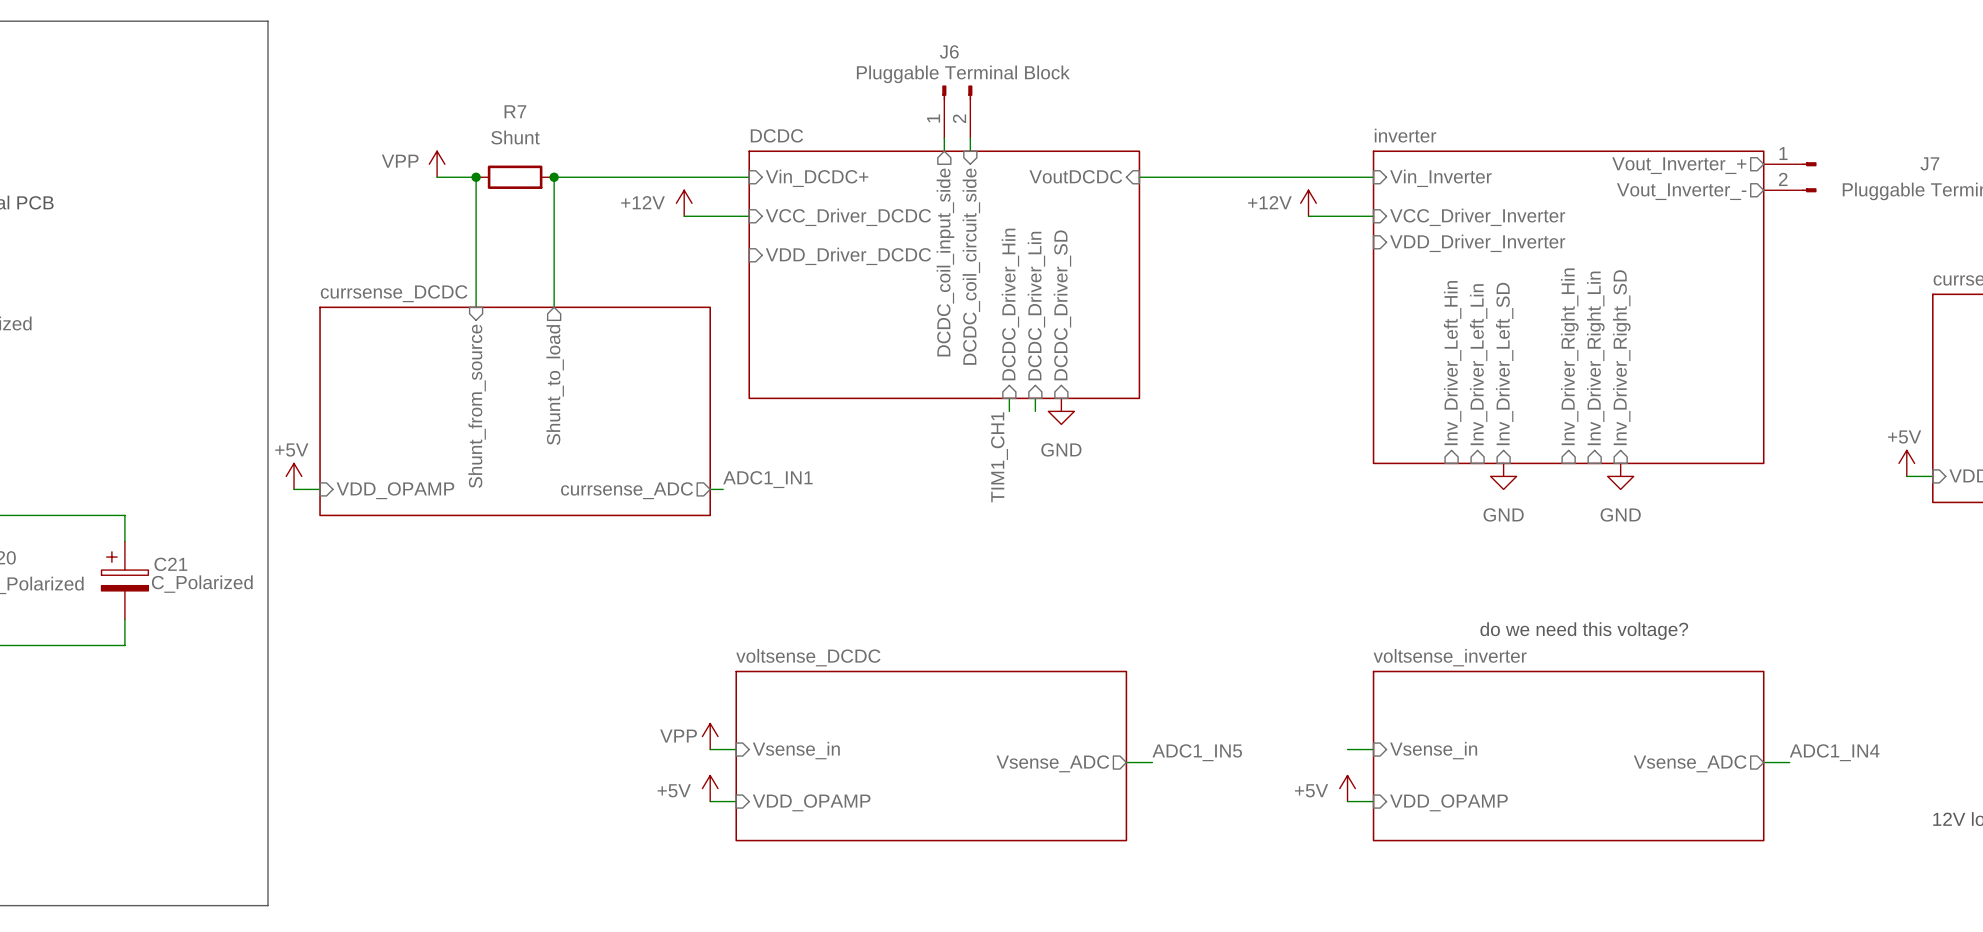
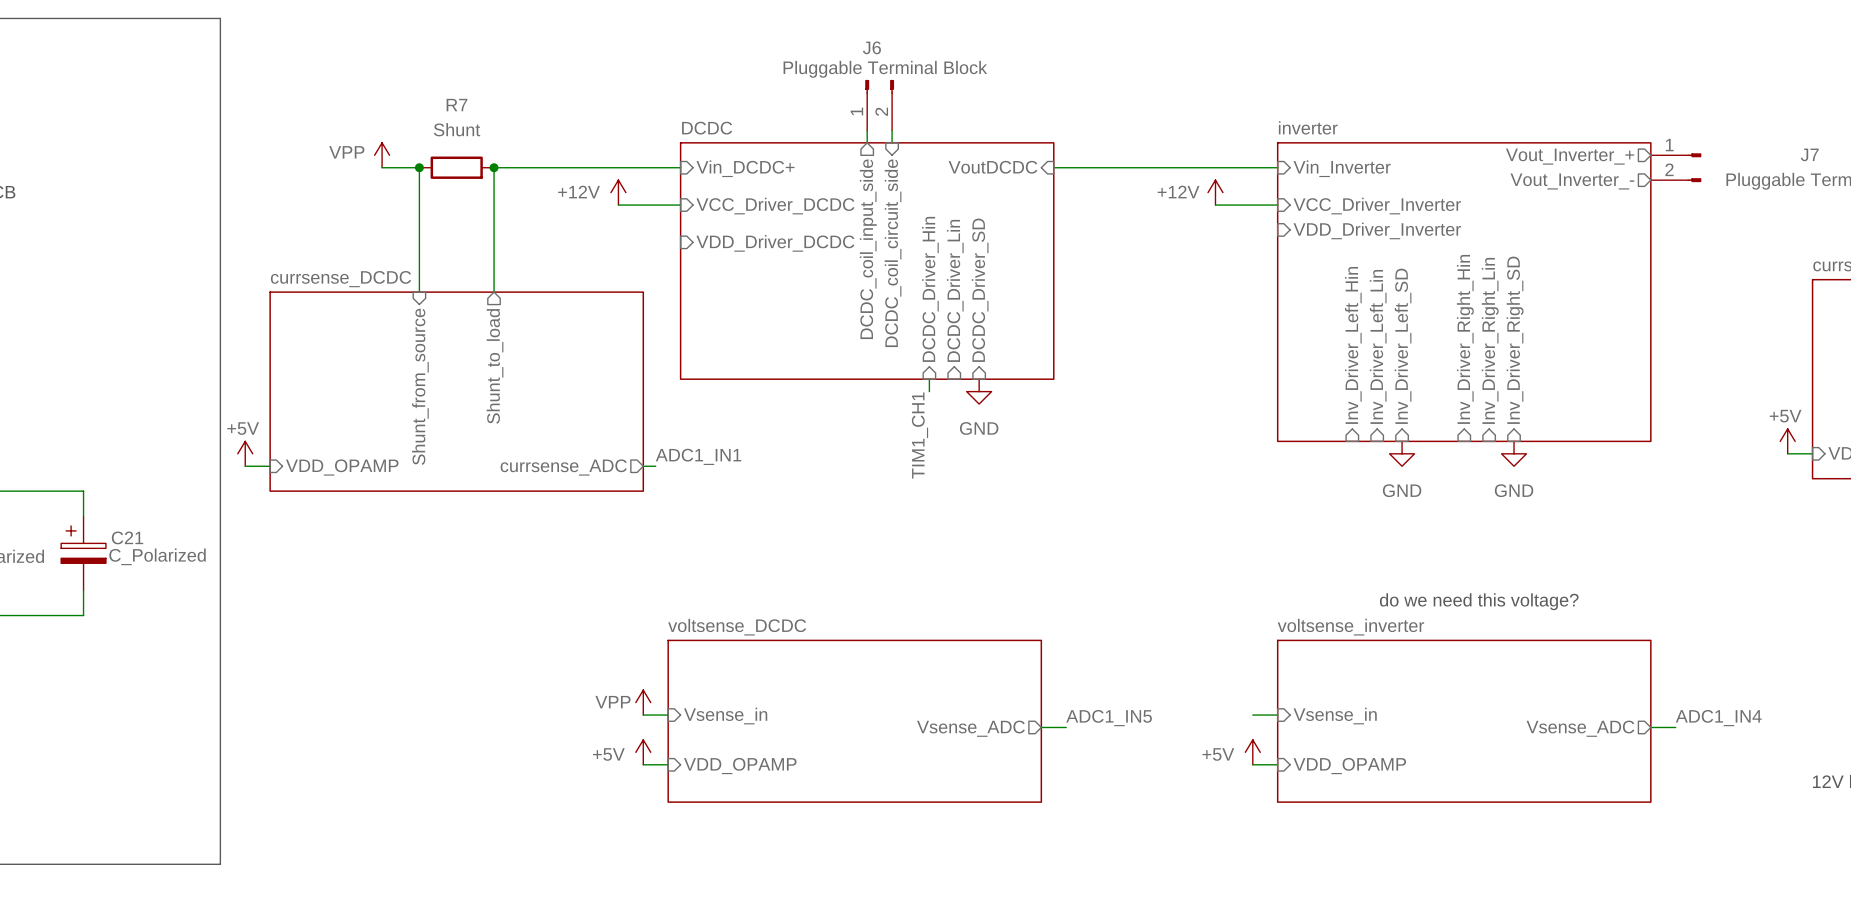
wire: (1035, 398) (1035, 411) -> none

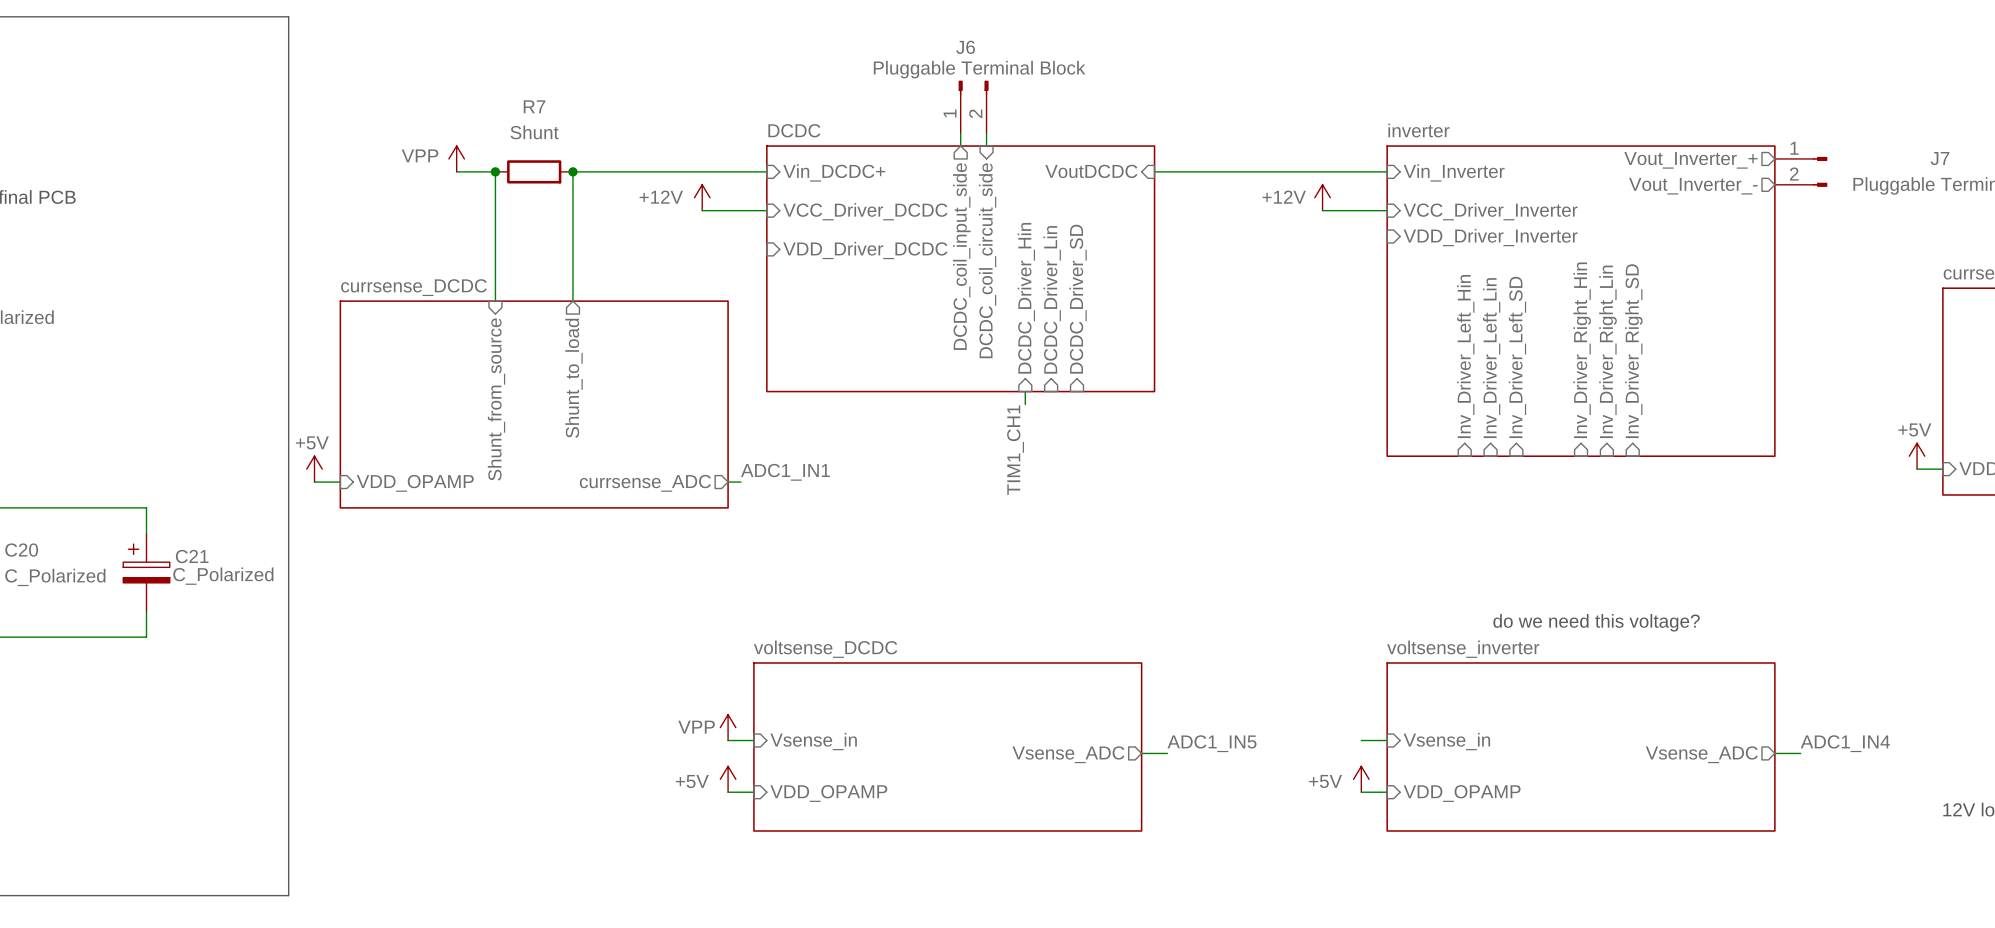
power symbol: GND (979, 391) -> none
power symbol: GND (1402, 453) -> none
power symbol: GND (1514, 453) -> none

